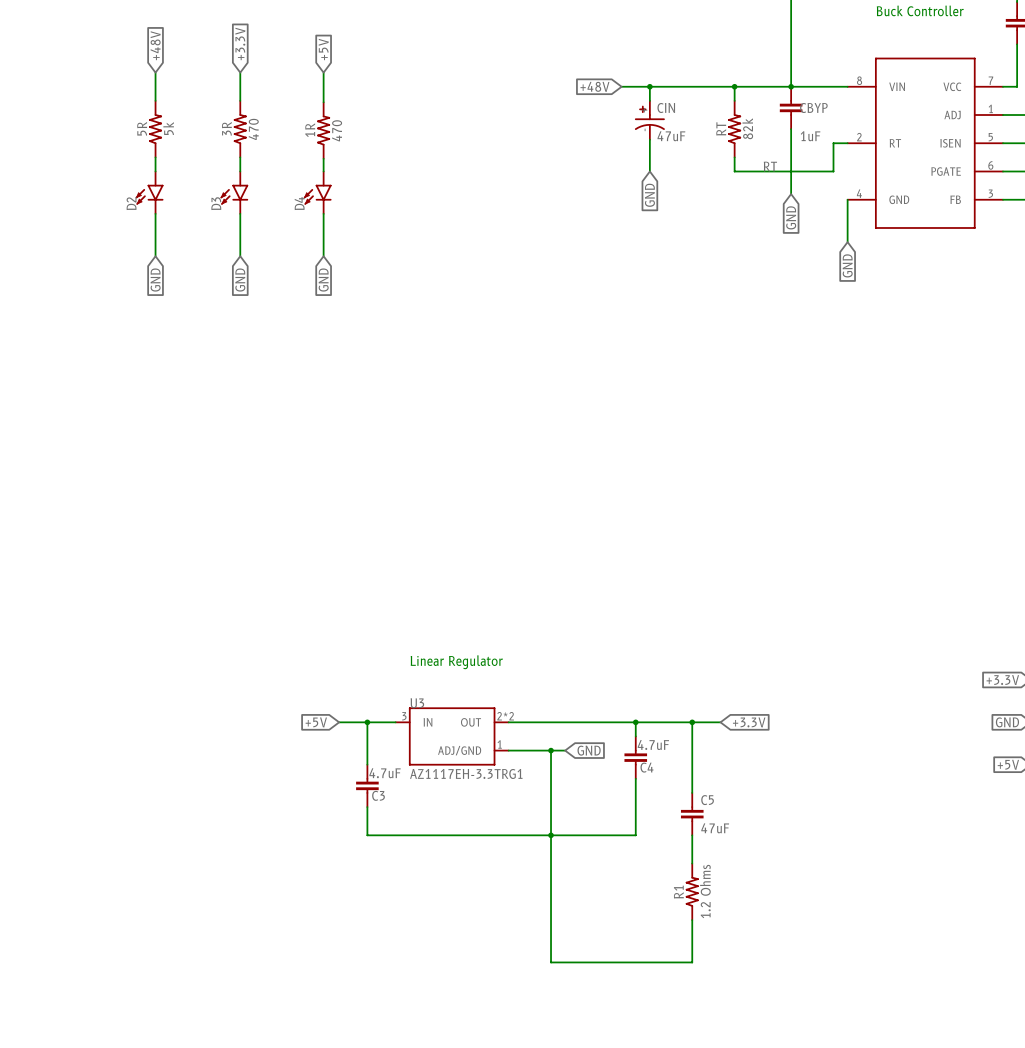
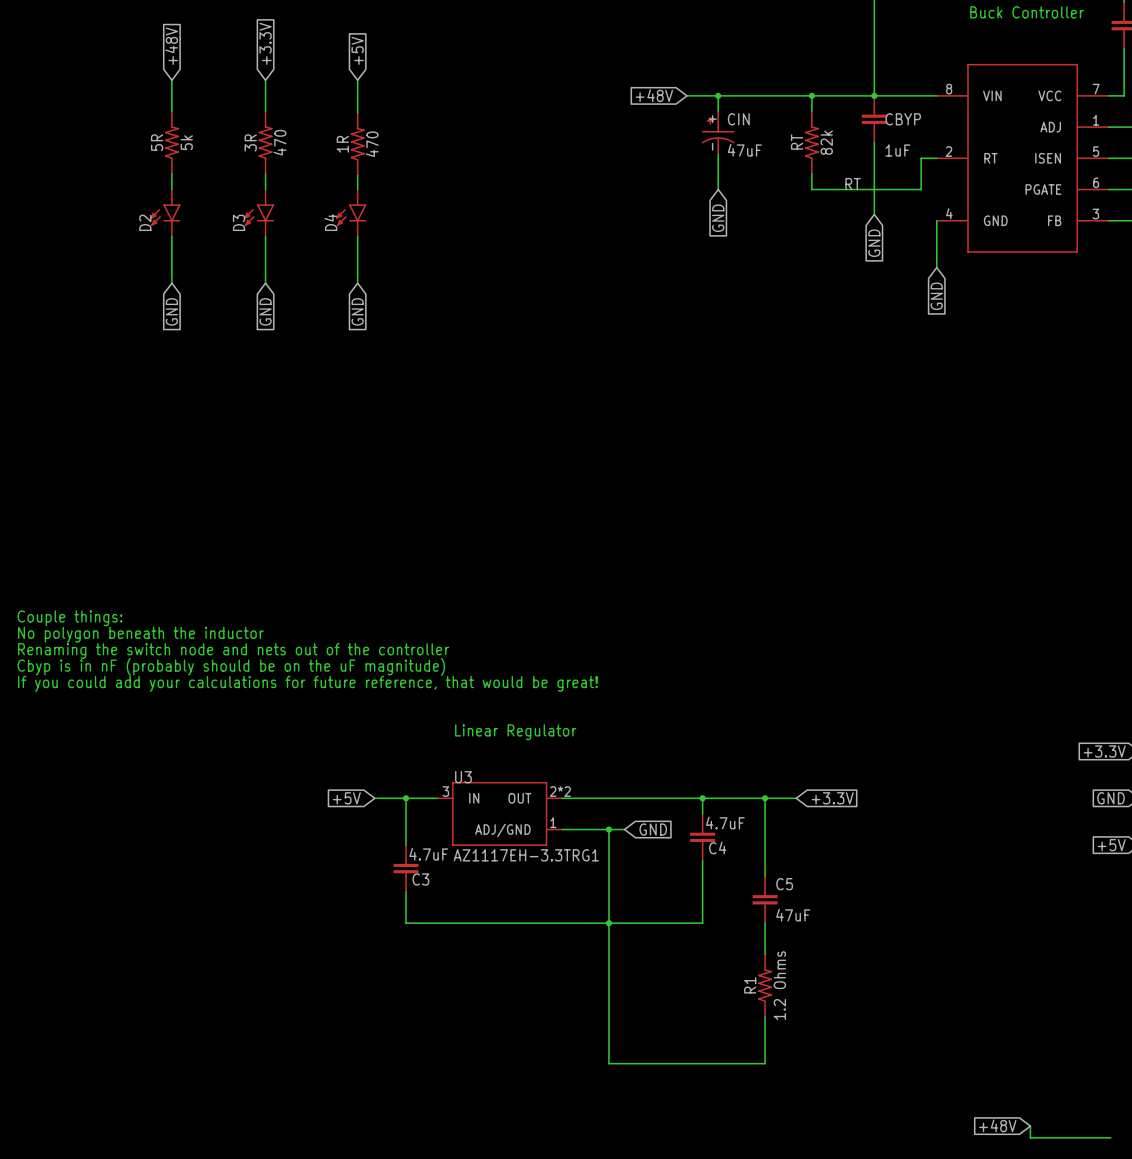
text: none -> Couple things: (69, 618)
text: none -> No polygon beneath the inductor (140, 634)
text: none -> Renaming the switch node and nets out of the controller (233, 651)
text: none -> Cbyp is in nF (probably should be on the uF magnitude) (231, 666)
text: none -> If you could add your calculations for future reference, that would be great! (307, 683)
wire: none -> (1030, 1126) (1030, 1137) (1110, 1137)
global label: none -> +48V (997, 1125)

